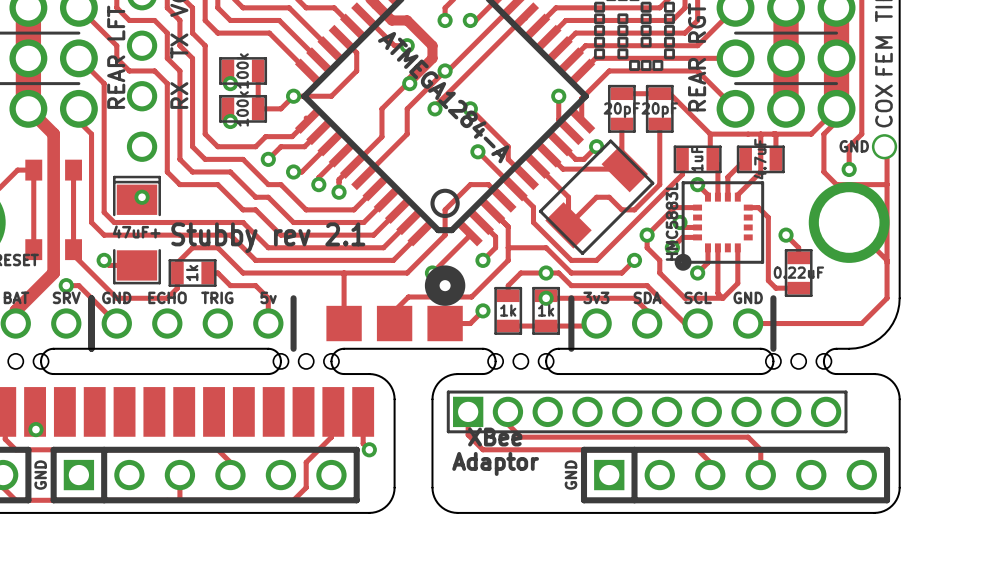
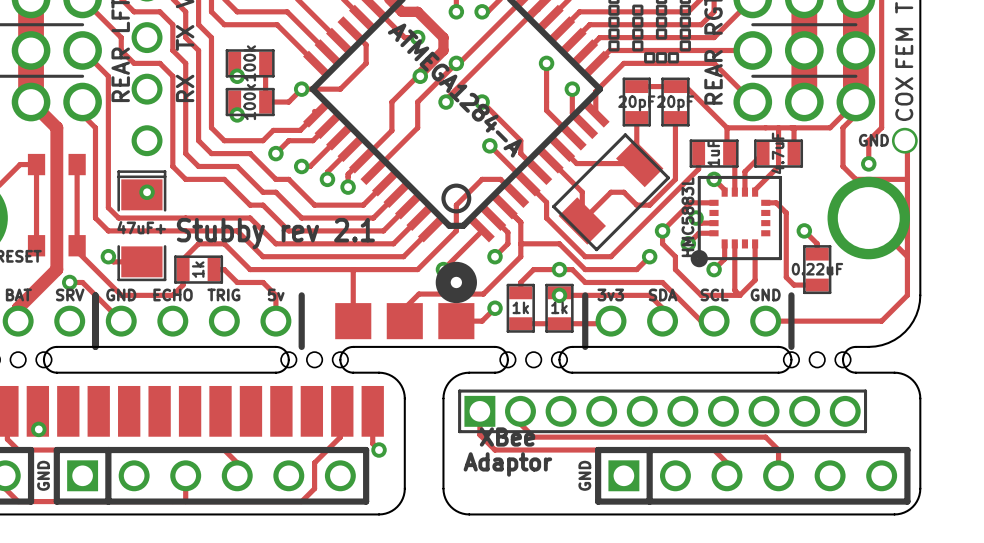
track: (559, 142) (575, 159) (584, 159) (596, 146) -> (572, 136) (546, 110) (546, 63)
via position: (596, 146) -> (546, 63)

